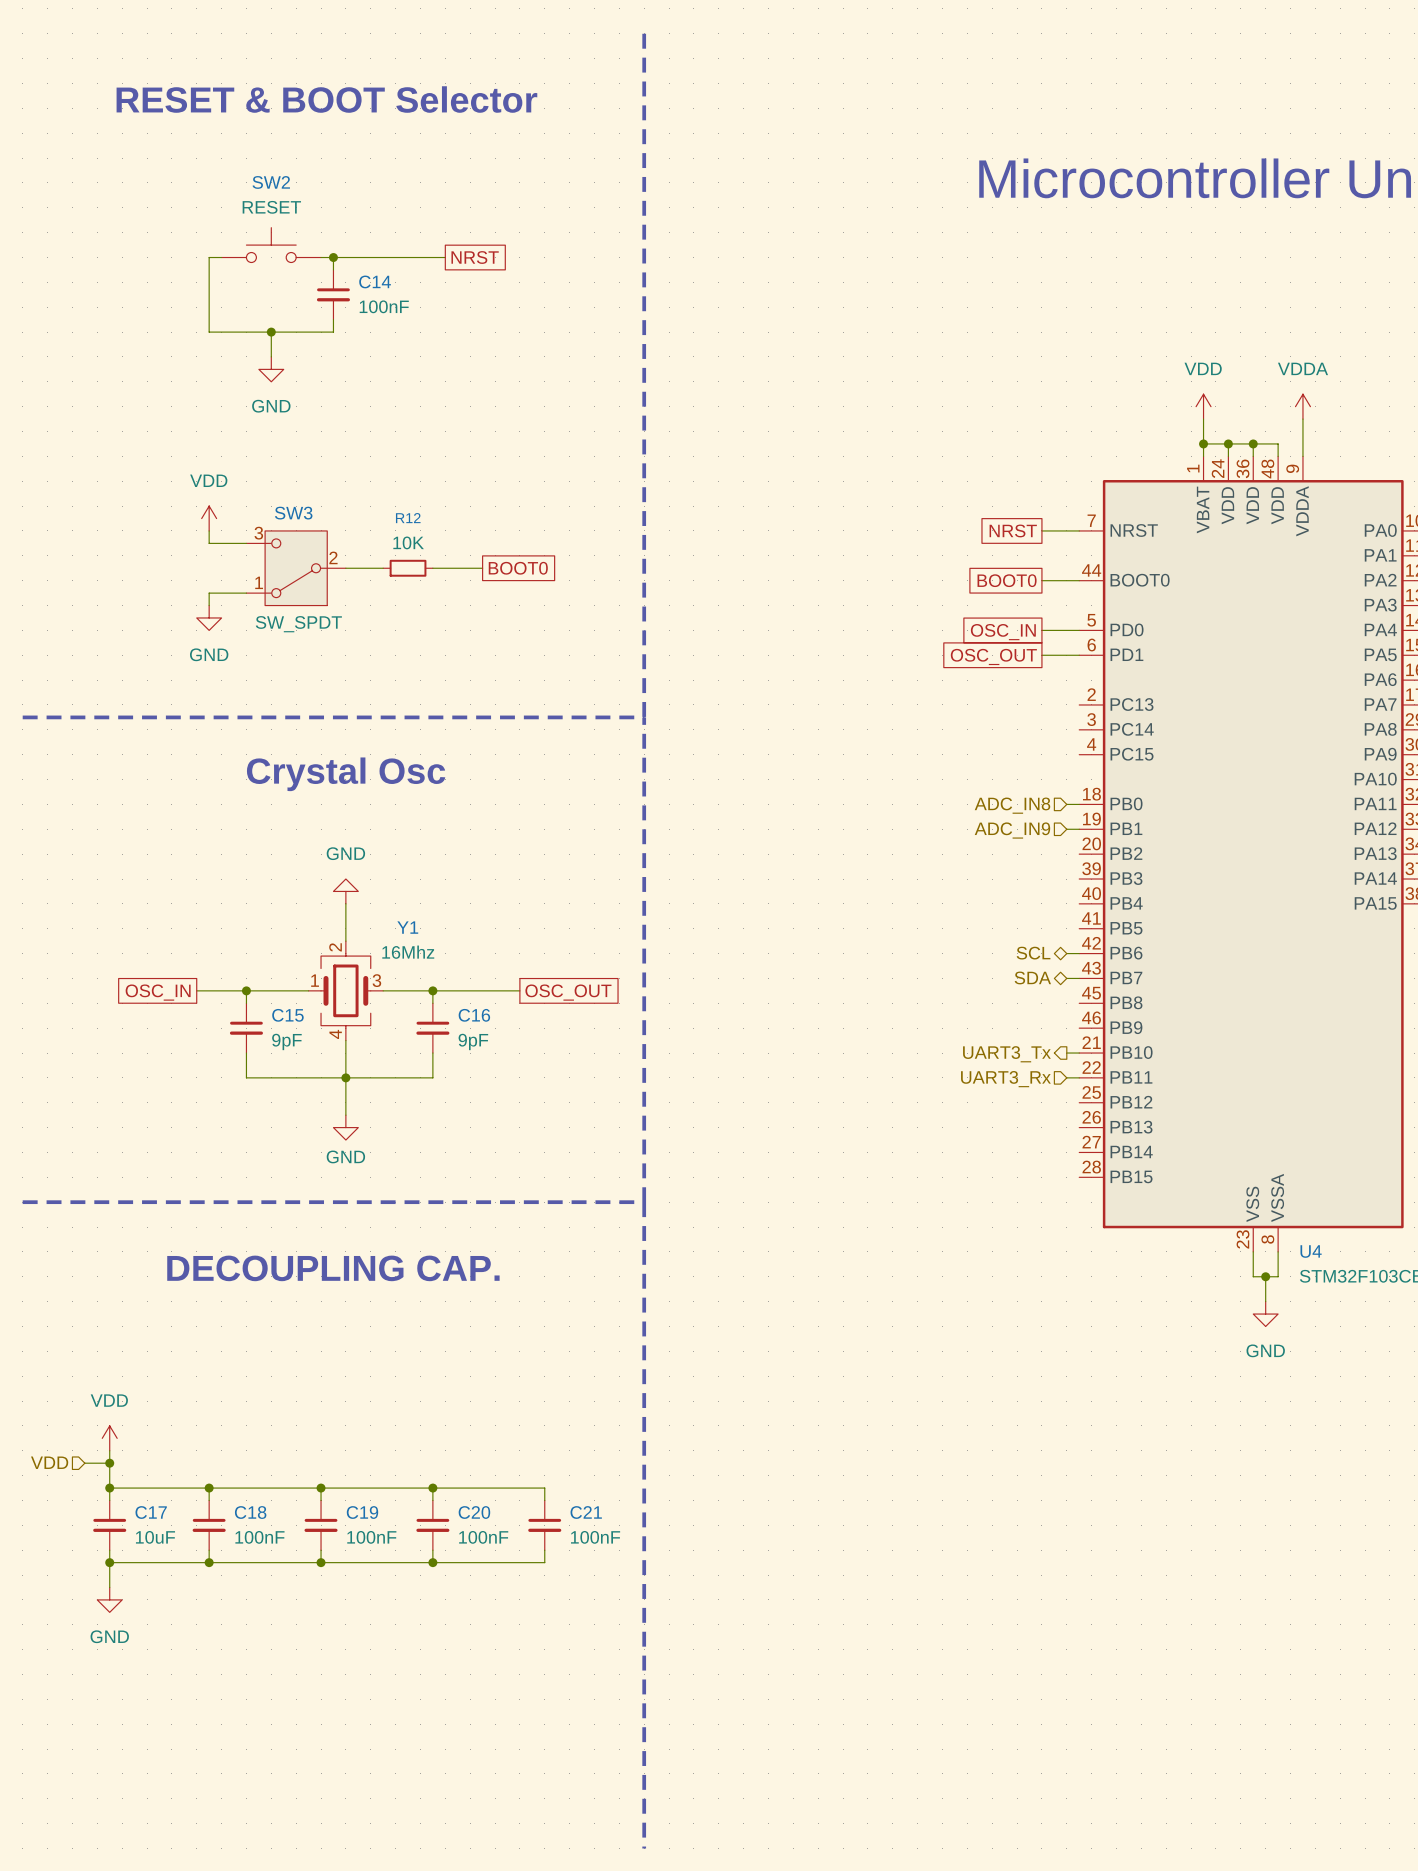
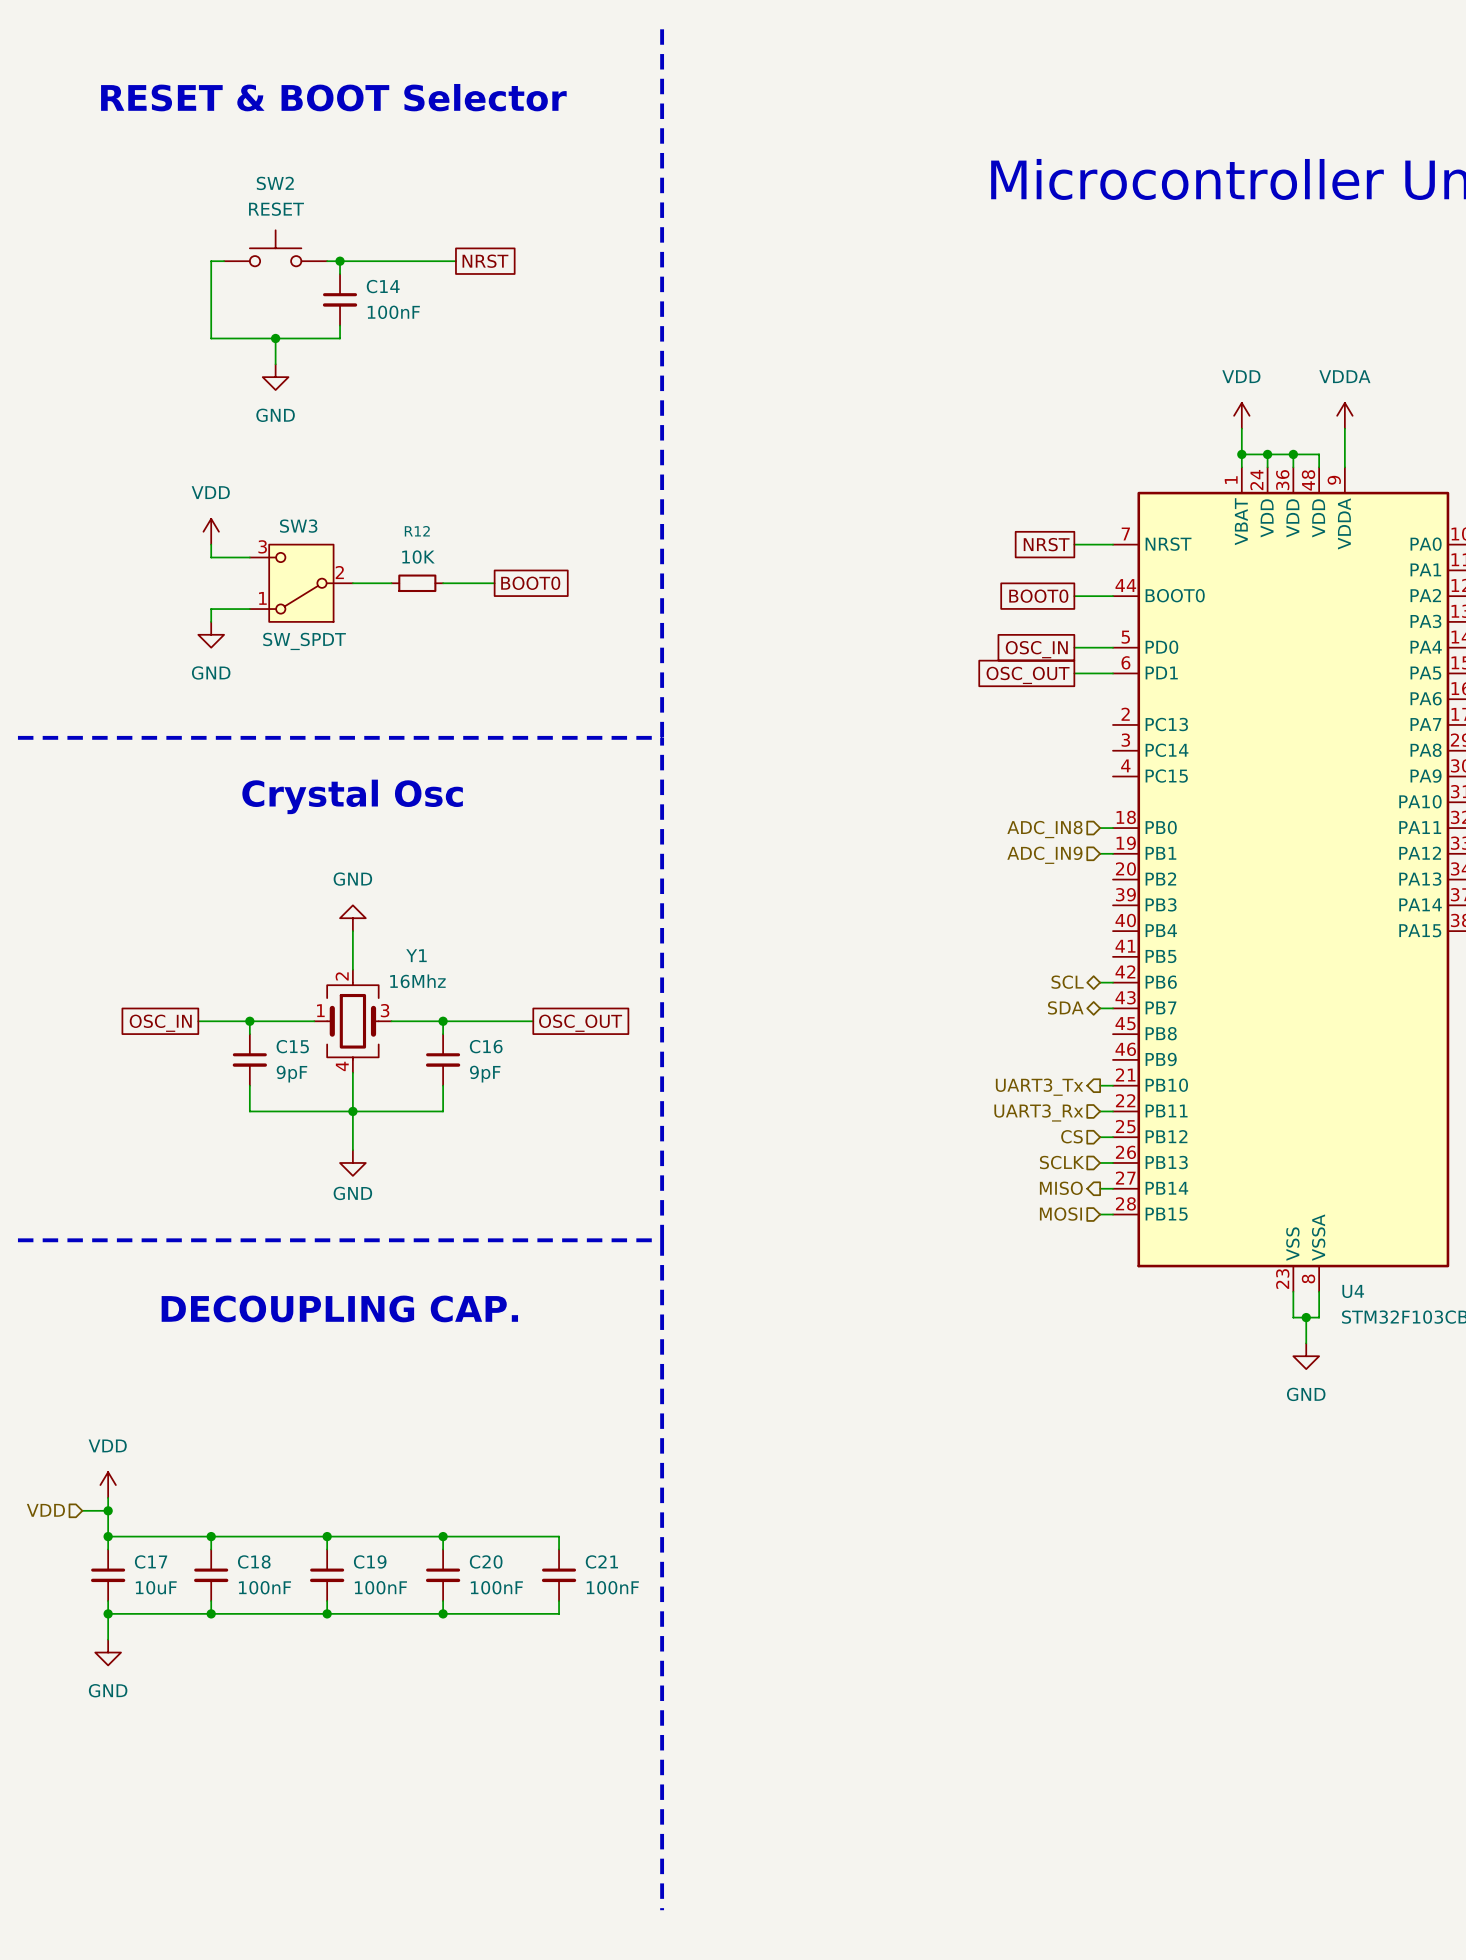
hierarchical label: none -> CS (1071, 1136)
wire: none -> (1100, 1137) (1112, 1137)
hierarchical label: none -> SCLK (1062, 1162)
wire: none -> (1100, 1162) (1112, 1162)
hierarchical label: none -> MISO (1061, 1188)
wire: none -> (1100, 1188) (1112, 1188)
hierarchical label: none -> MOSI (1060, 1214)
wire: none -> (1100, 1214) (1112, 1214)

